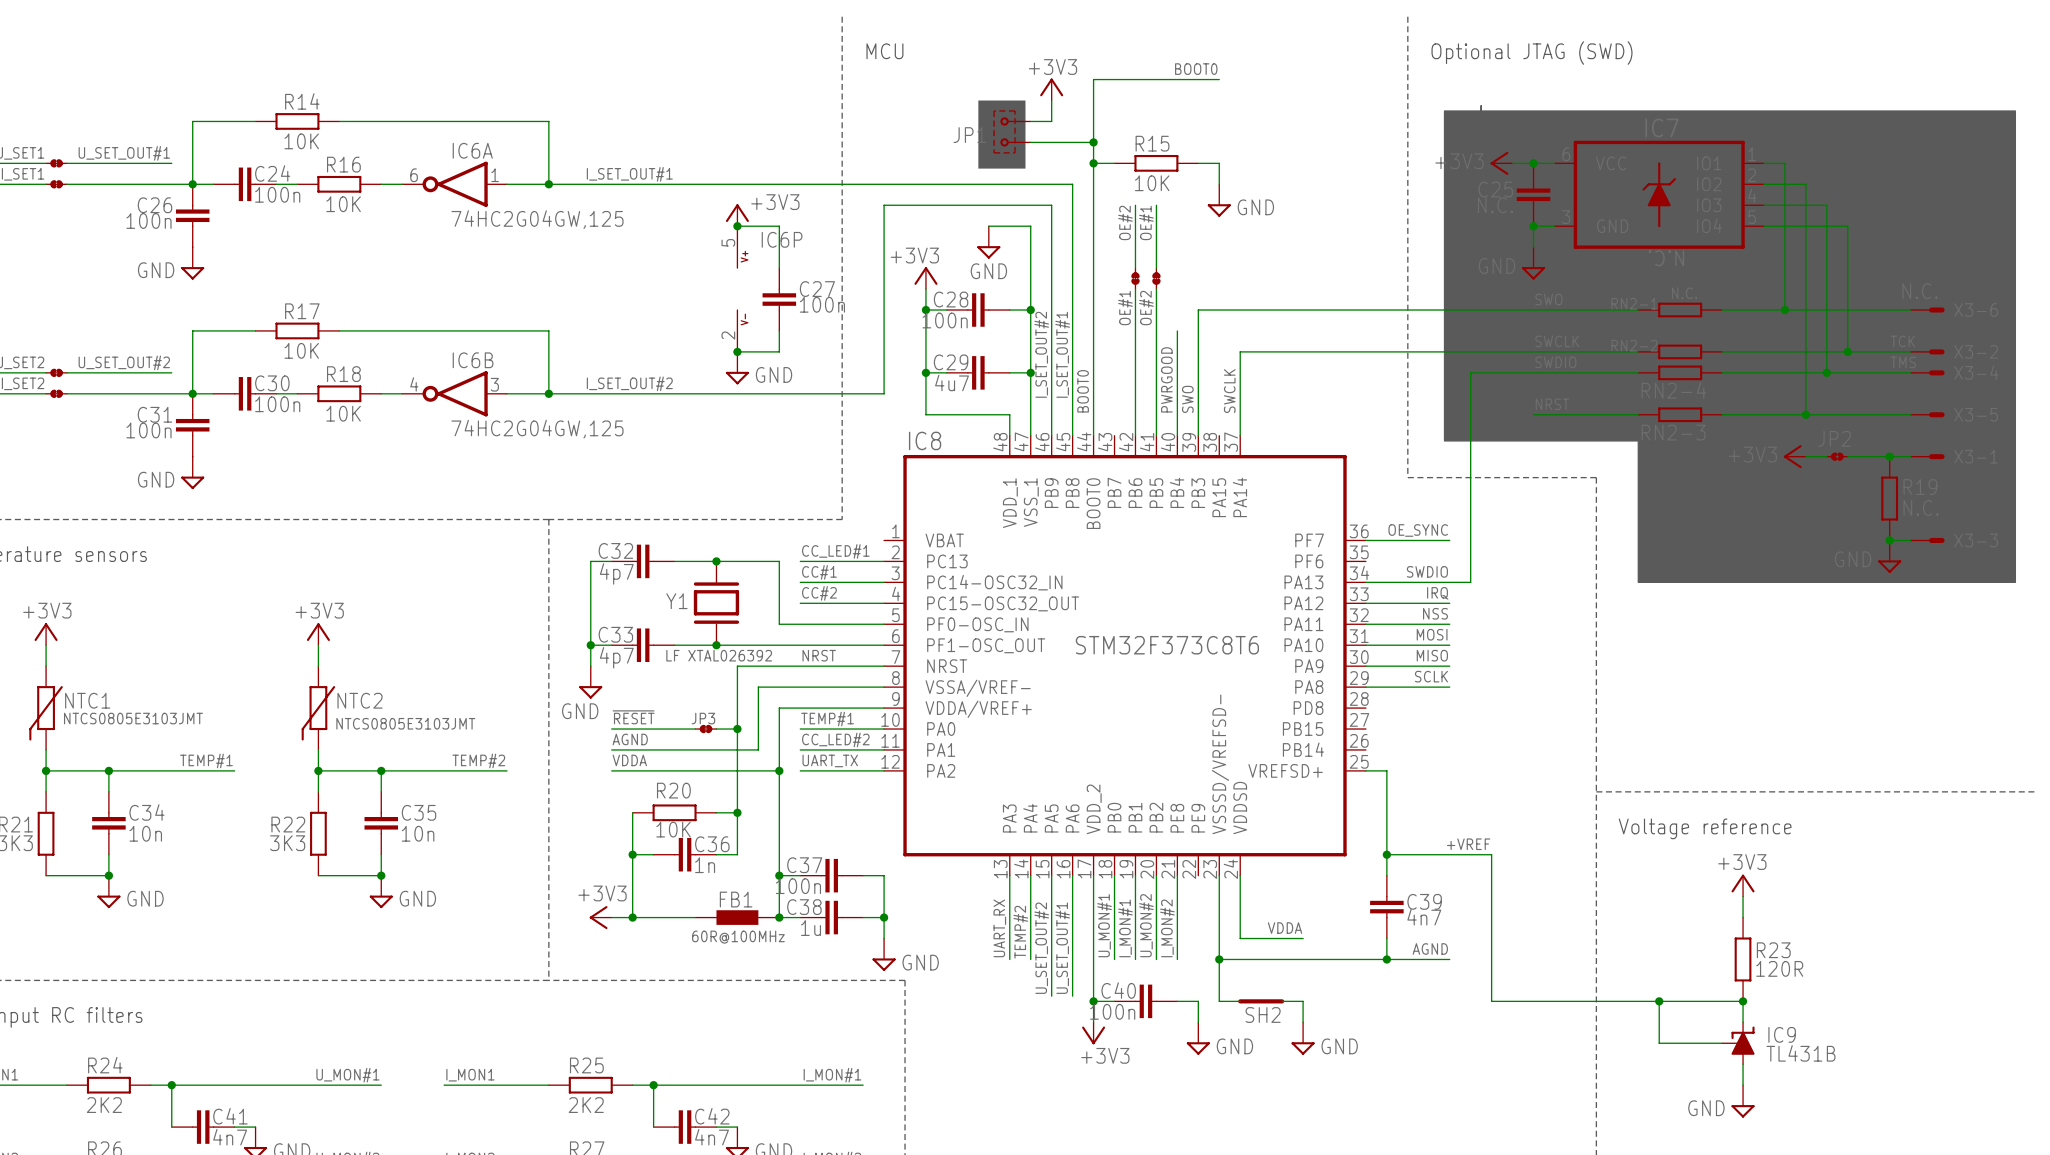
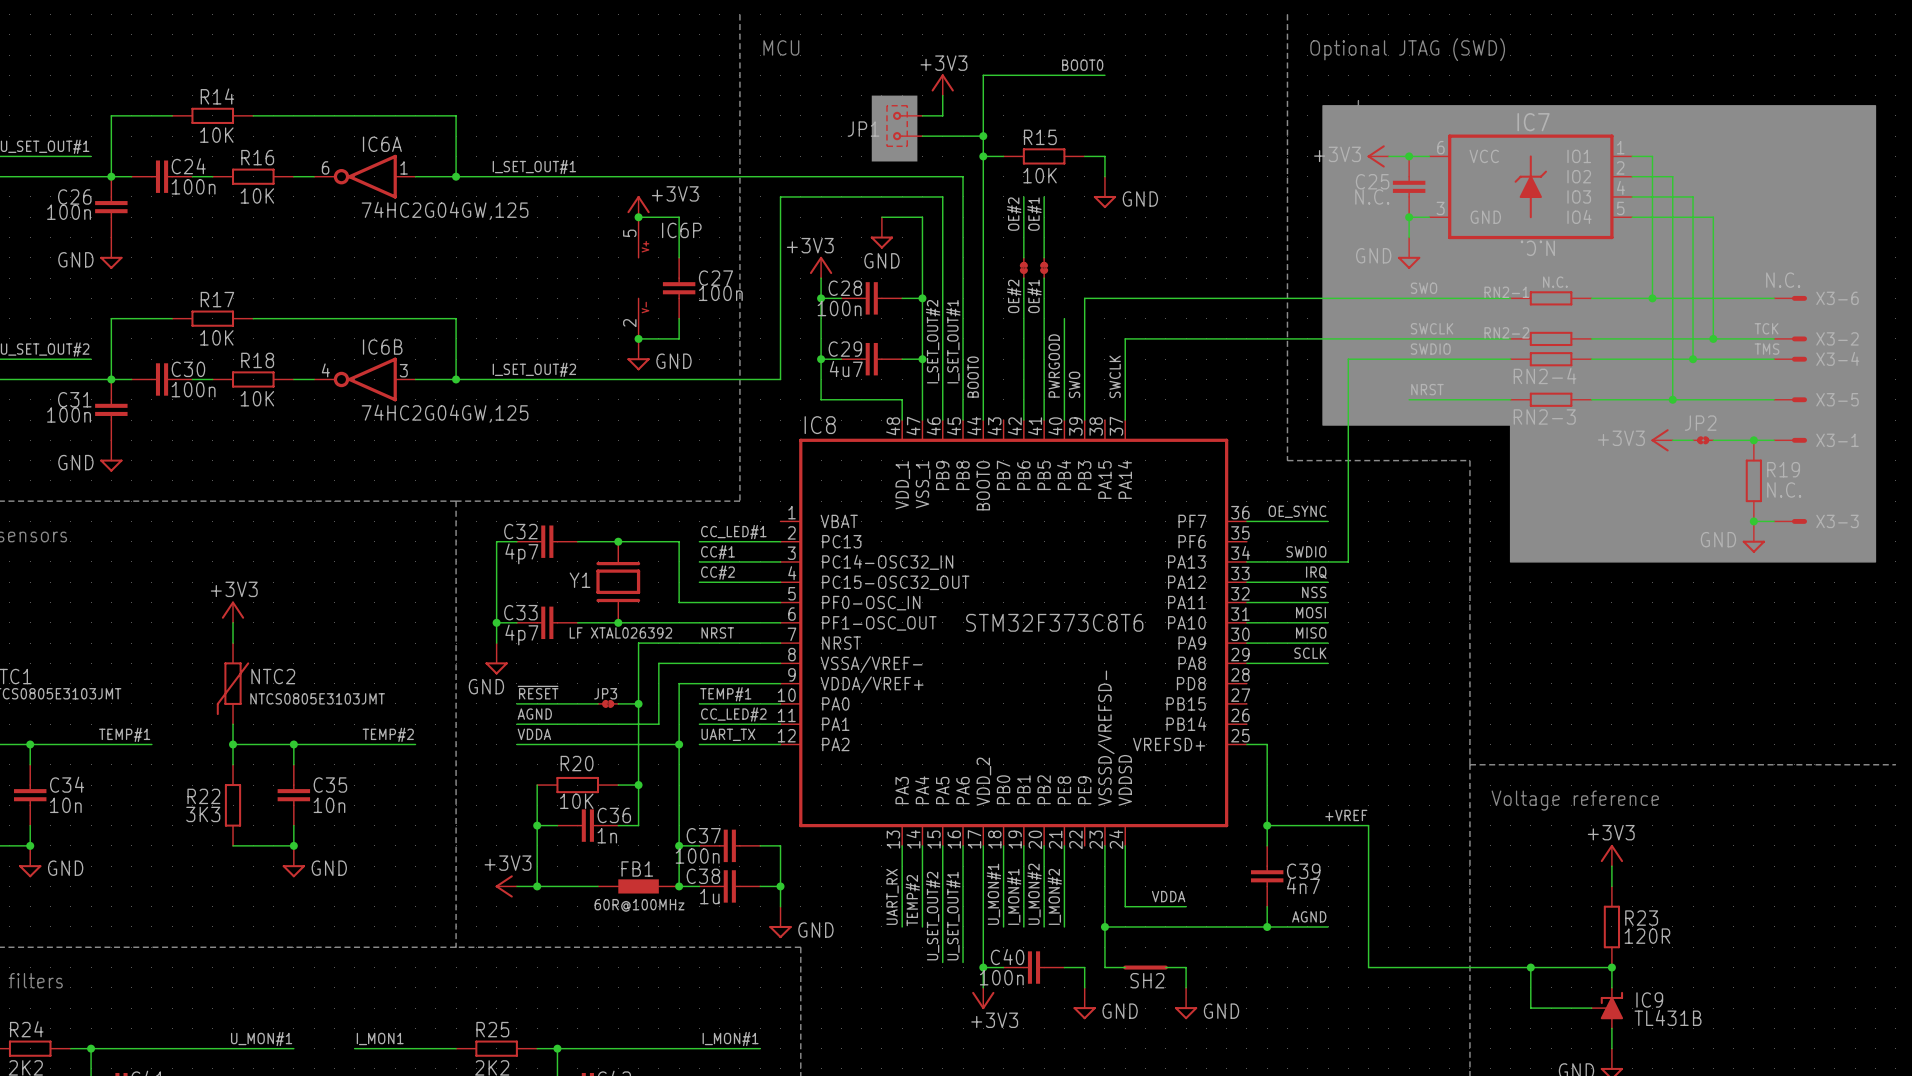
OE#1 name: OE#1 (1125, 308) -> OE#2 (1014, 296)
OE#2 name: OE#2 (1146, 308) -> OE#1 (1034, 296)

